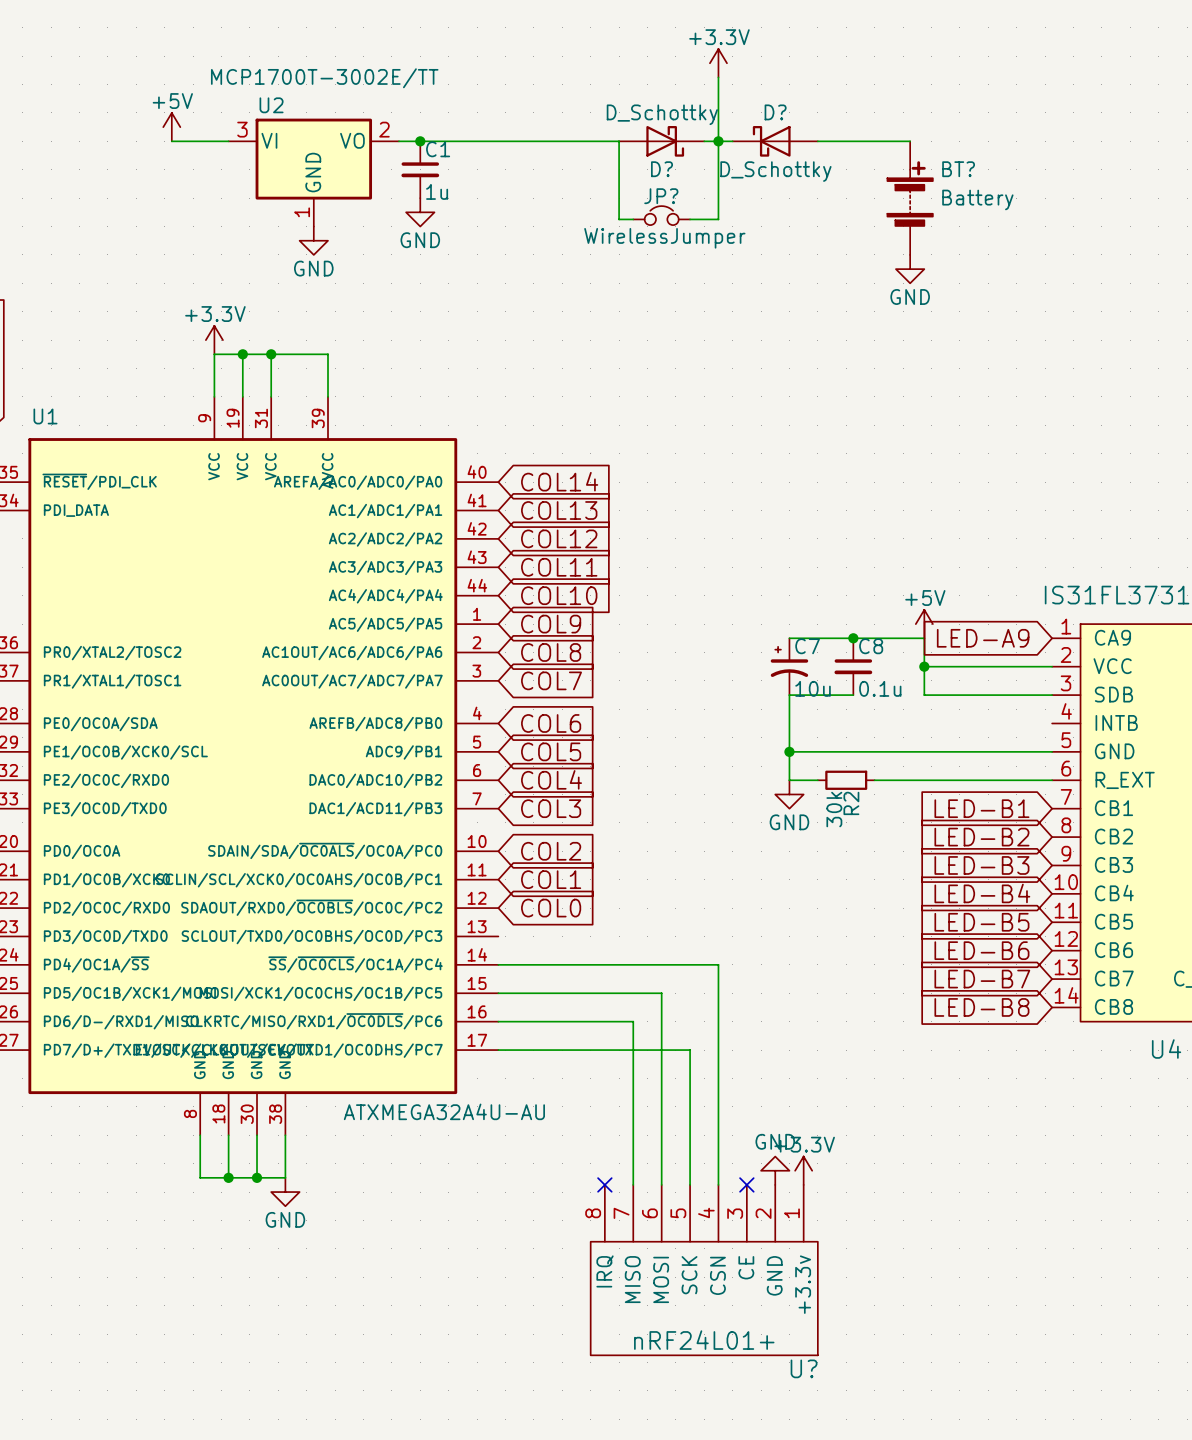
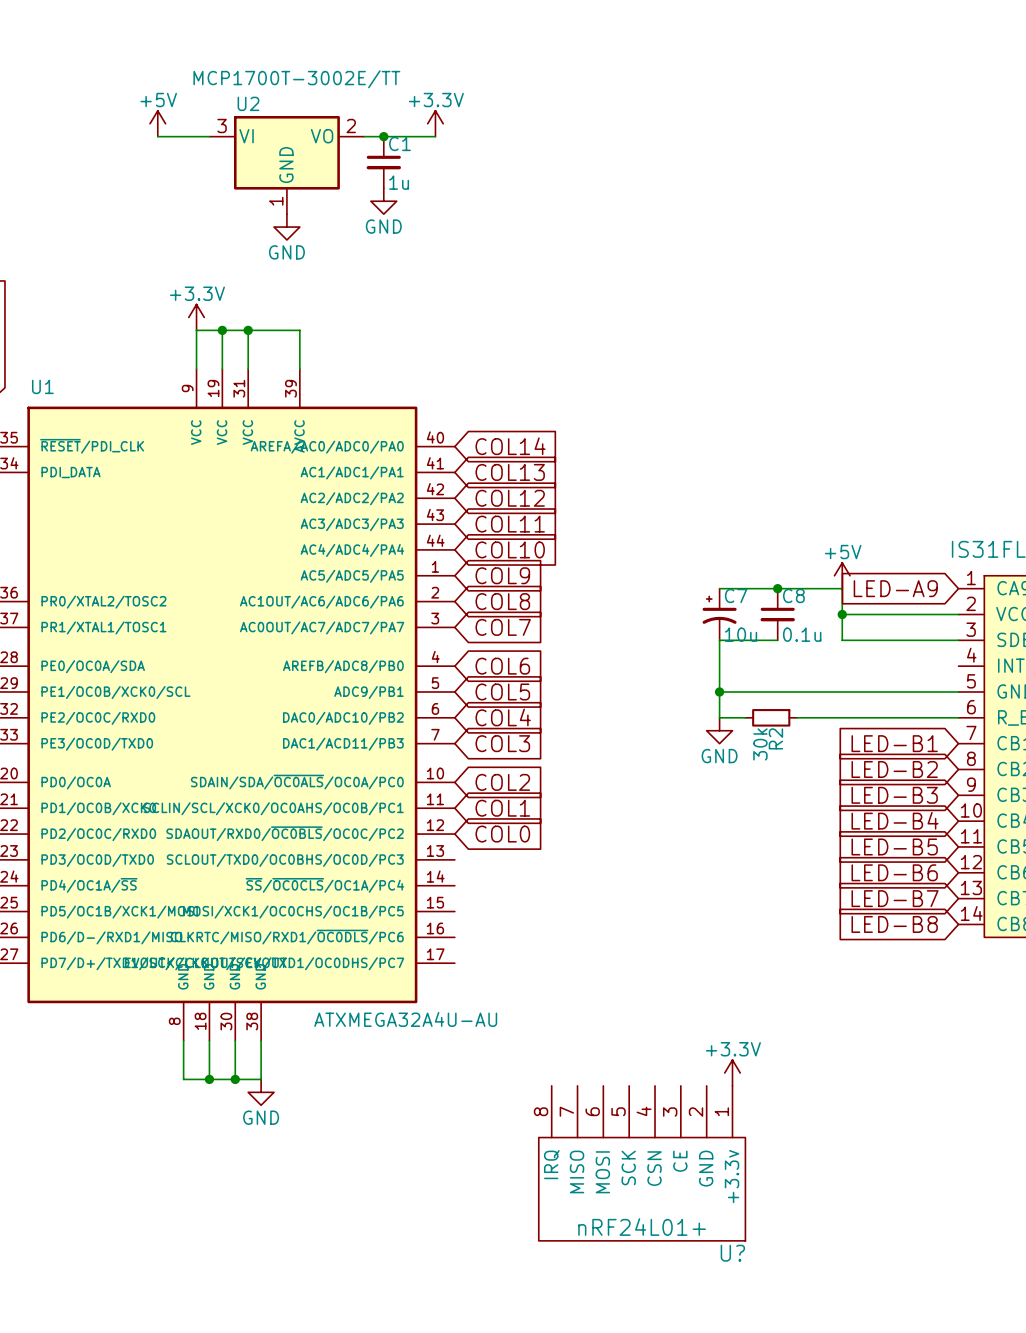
power symbol position: +3.3V (718, 63) -> +3.3V (435, 123)
wire: (718, 77) (718, 219) (690, 219) -> none
wire: (477, 141) (619, 141) (619, 219) (633, 219) -> none
D?: D_Schottky (661, 141) -> none
wire: (704, 141) (732, 141) -> none
junction: (718, 141) -> none
D?: D_Schottky (775, 141) -> none
wire: (817, 141) (910, 141) -> none
BT?: Battery (910, 198) -> none
JP?: WirelessJumper (661, 215) -> none
power symbol: GND (910, 269) -> none
wire: (498, 964) (718, 964) (718, 1184) -> none
wire: (498, 993) (661, 993) (661, 1184) -> none
wire: (498, 1021) (633, 1021) (633, 1184) -> none
wire: (498, 1050) (690, 1050) (690, 1184) -> none
power symbol: GND (775, 1170) -> none
no-connect mark: (604, 1184) -> none
no-connect mark: (746, 1184) -> none

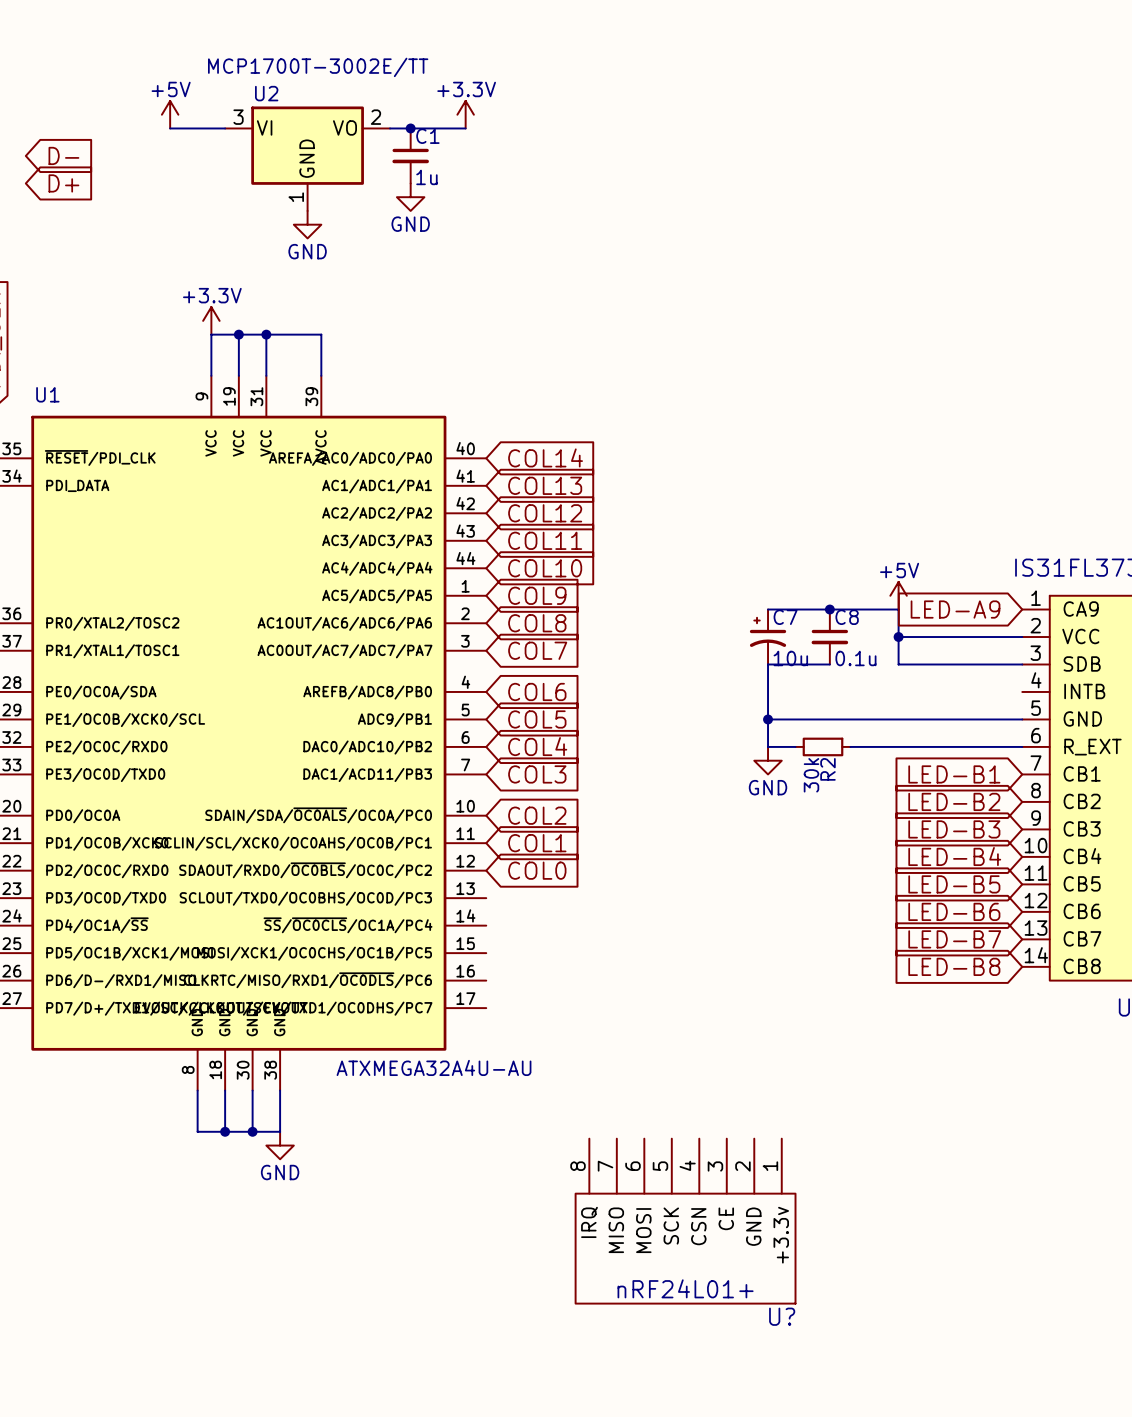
global label: none -> D- (63, 155)
global label: none -> D+ (63, 183)
power symbol: +3.3V (732, 1072) -> none

